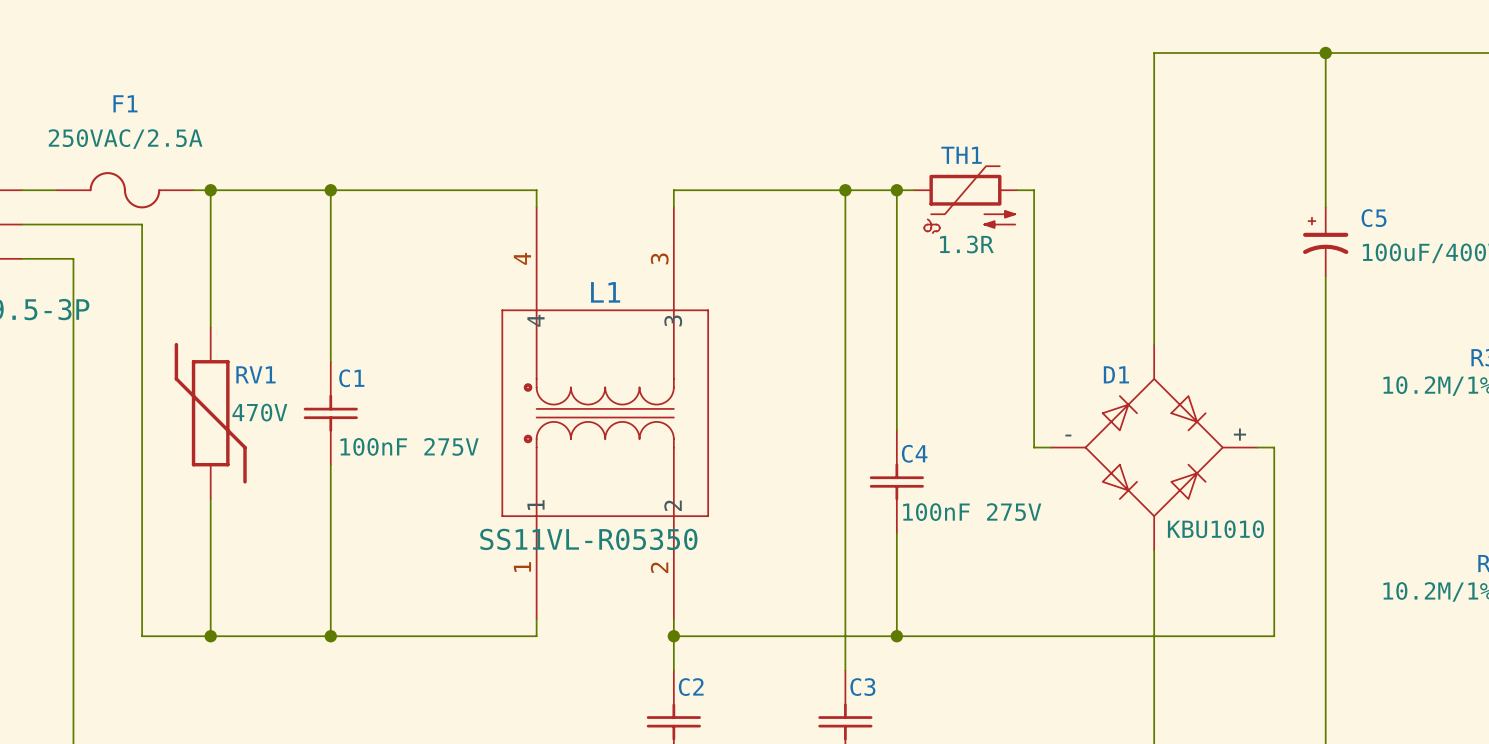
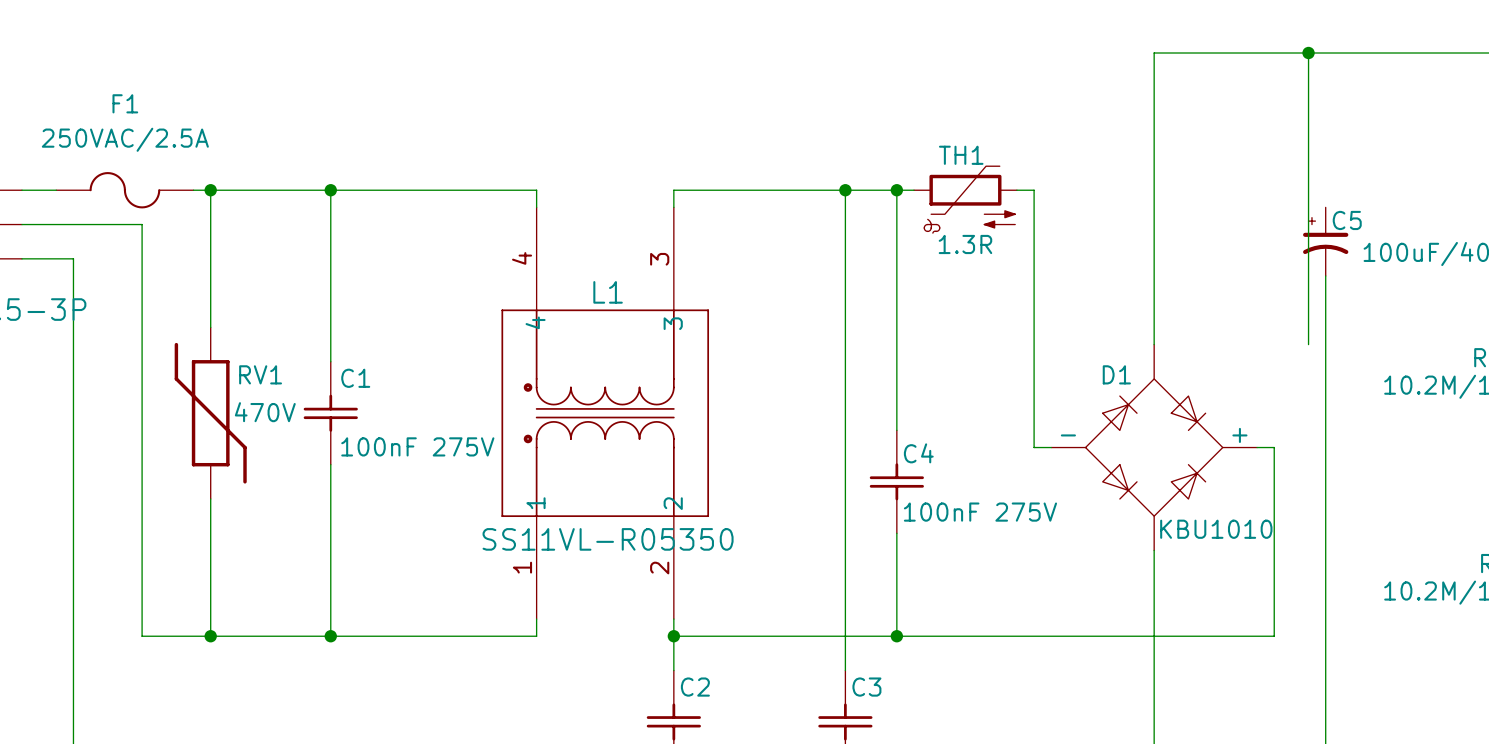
wire: none -> (1308, 53) (1308, 344)
wire: (1325, 53) (1325, 207) -> none
junction position: (1325, 53) -> (1308, 53)
C5 name position: C5 (1374, 218) -> C5 (1347, 220)

